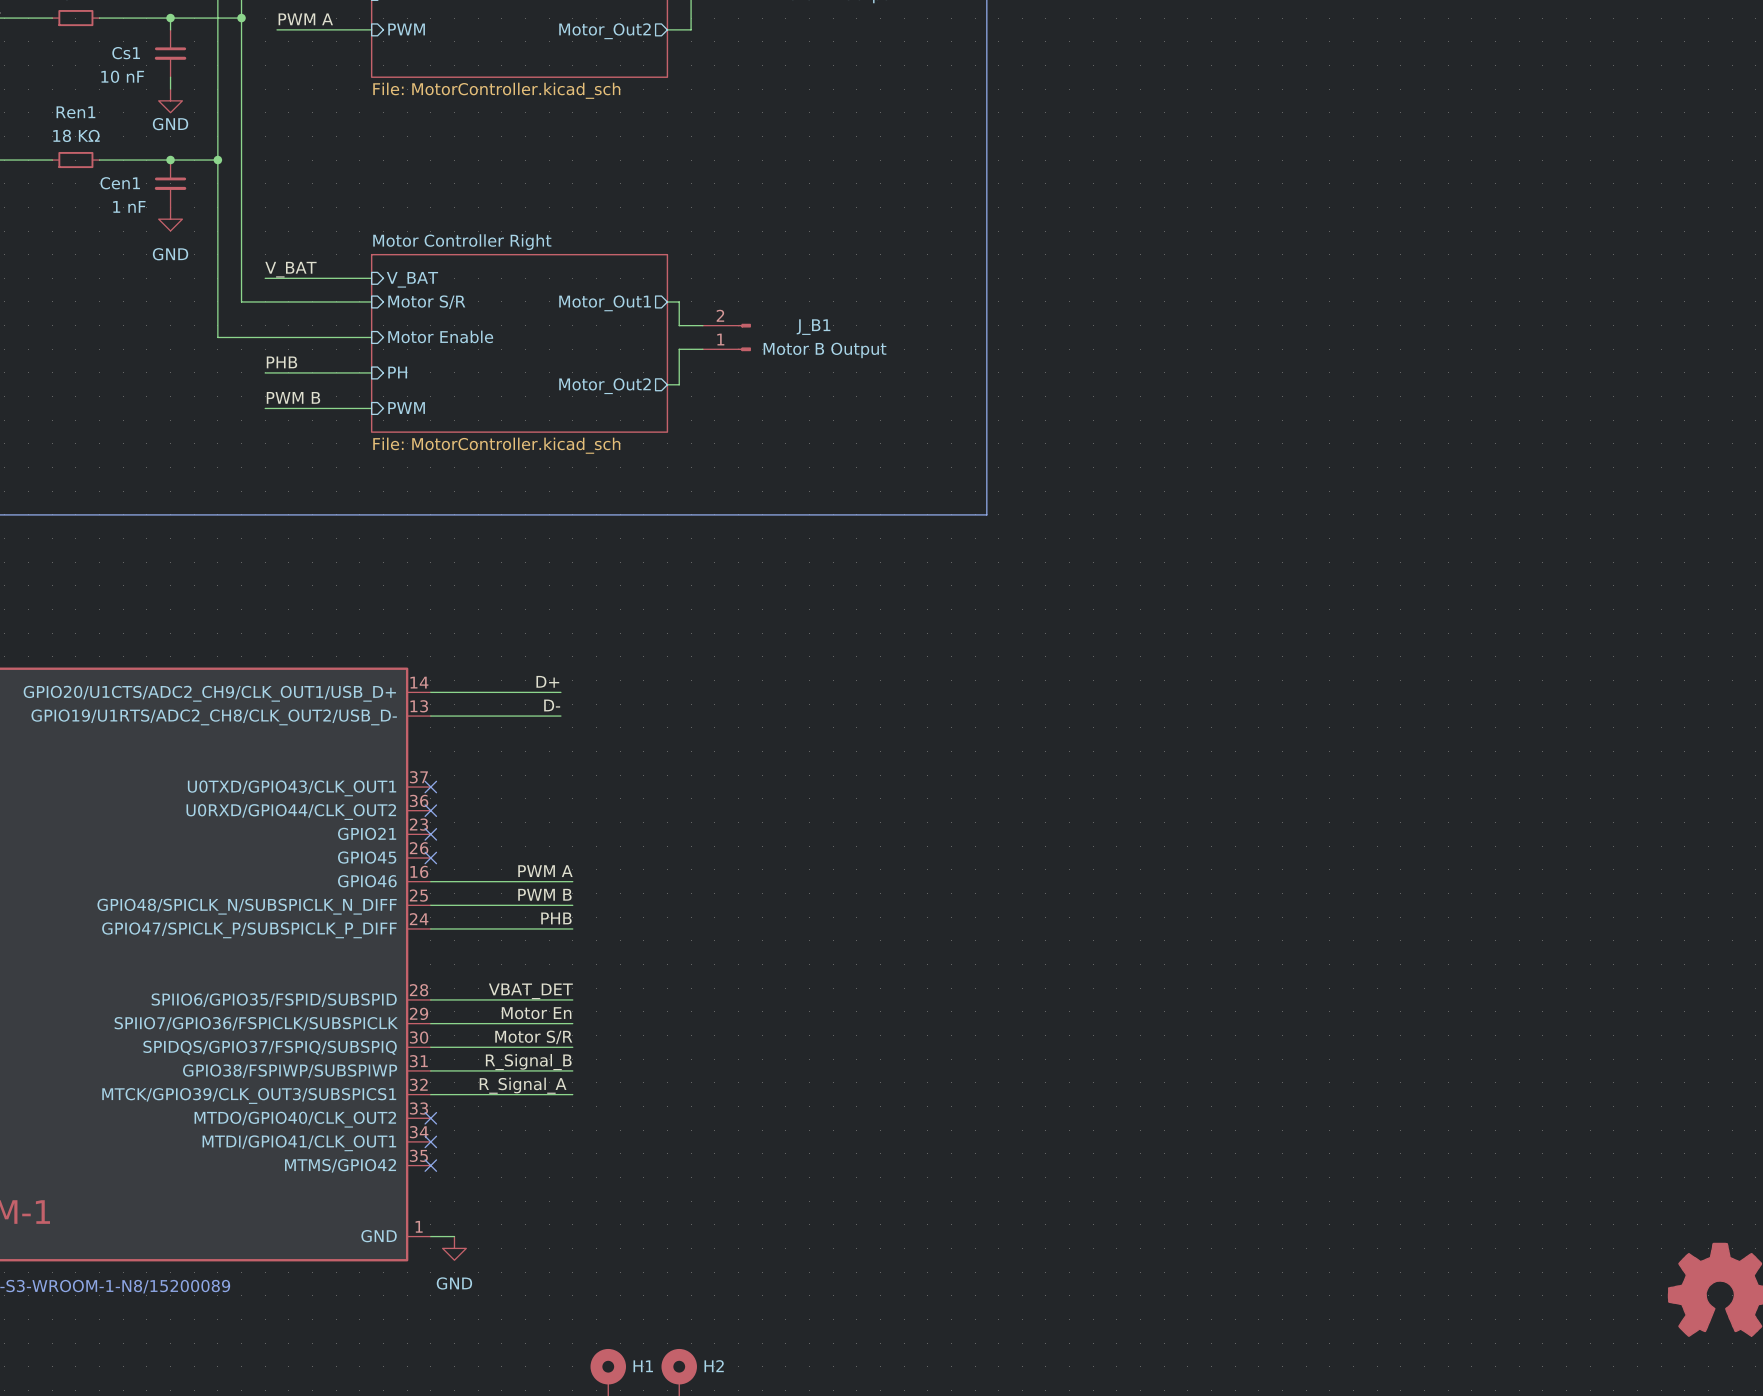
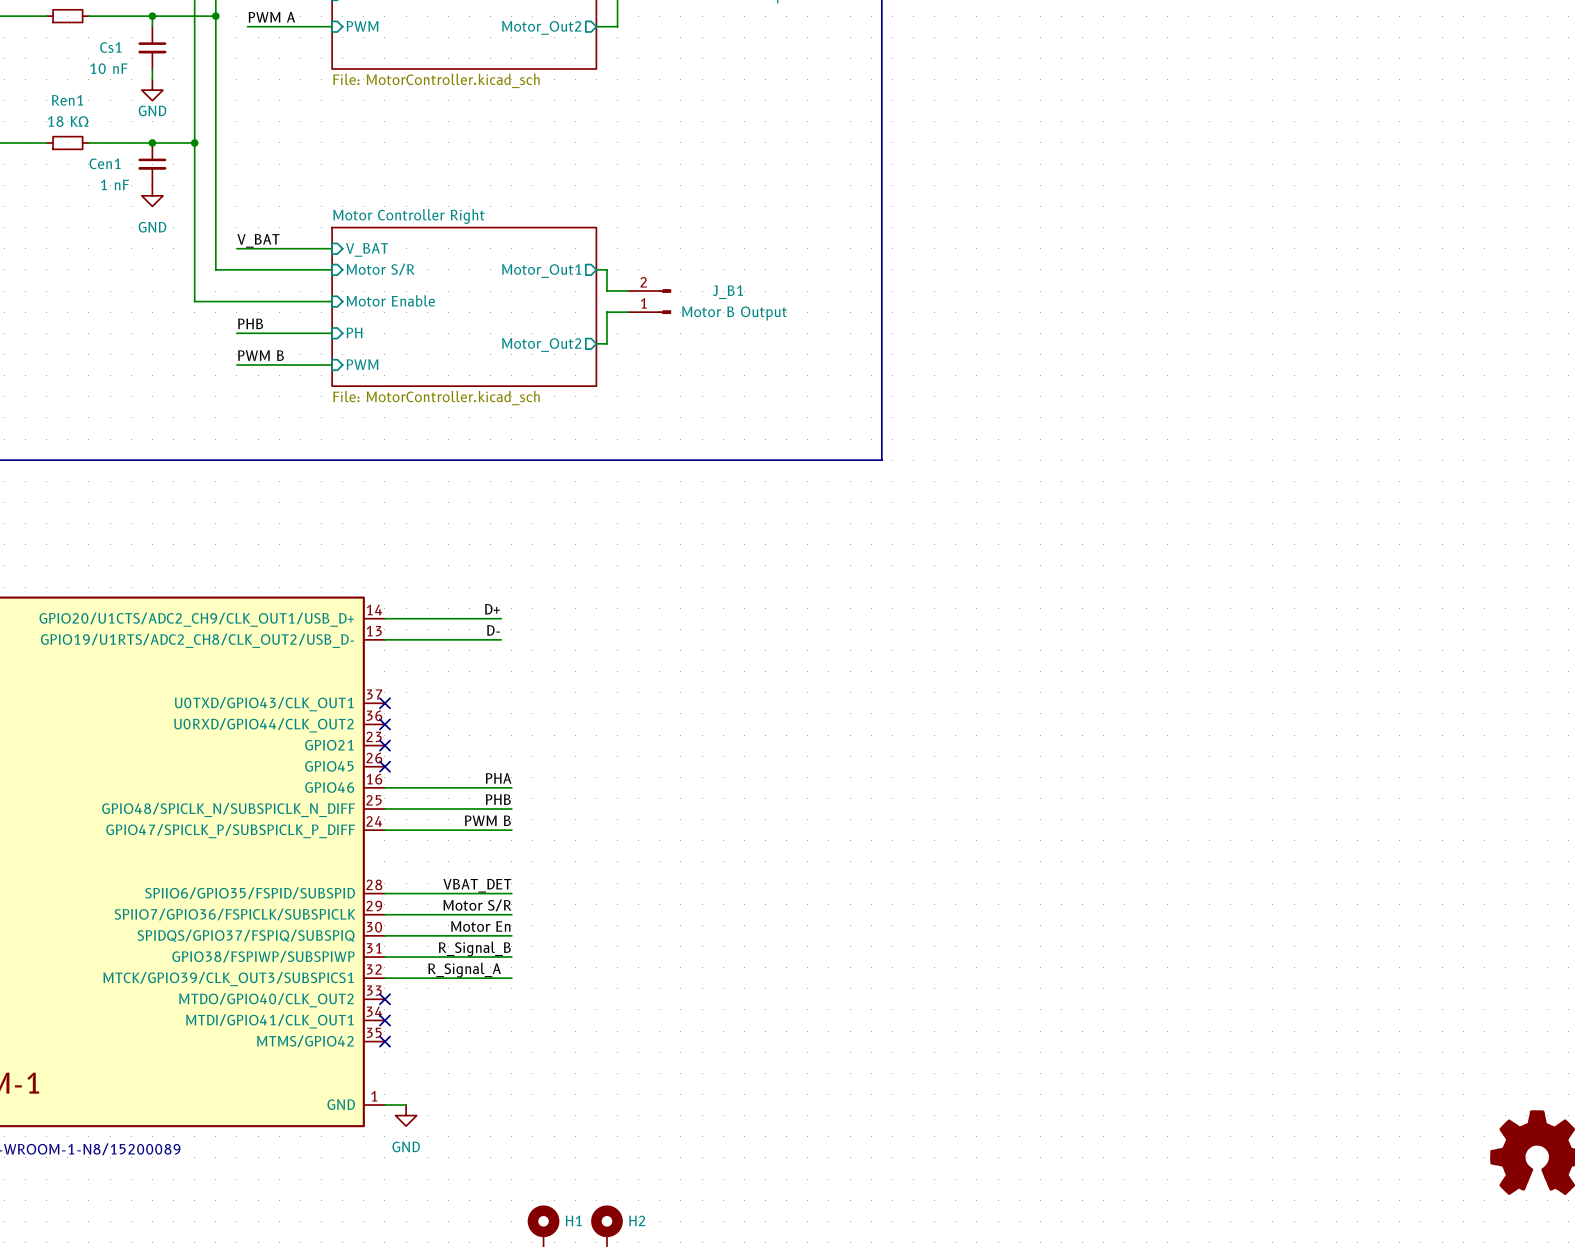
label: PWM A (545, 871) -> PHA (498, 778)
label: PWM B (544, 894) -> PHB (498, 799)
label: PHB (556, 918) -> PWM B (487, 820)
label: Motor En (536, 1013) -> Motor S/R (477, 905)
label: Motor S/R (533, 1037) -> Motor En (480, 926)

